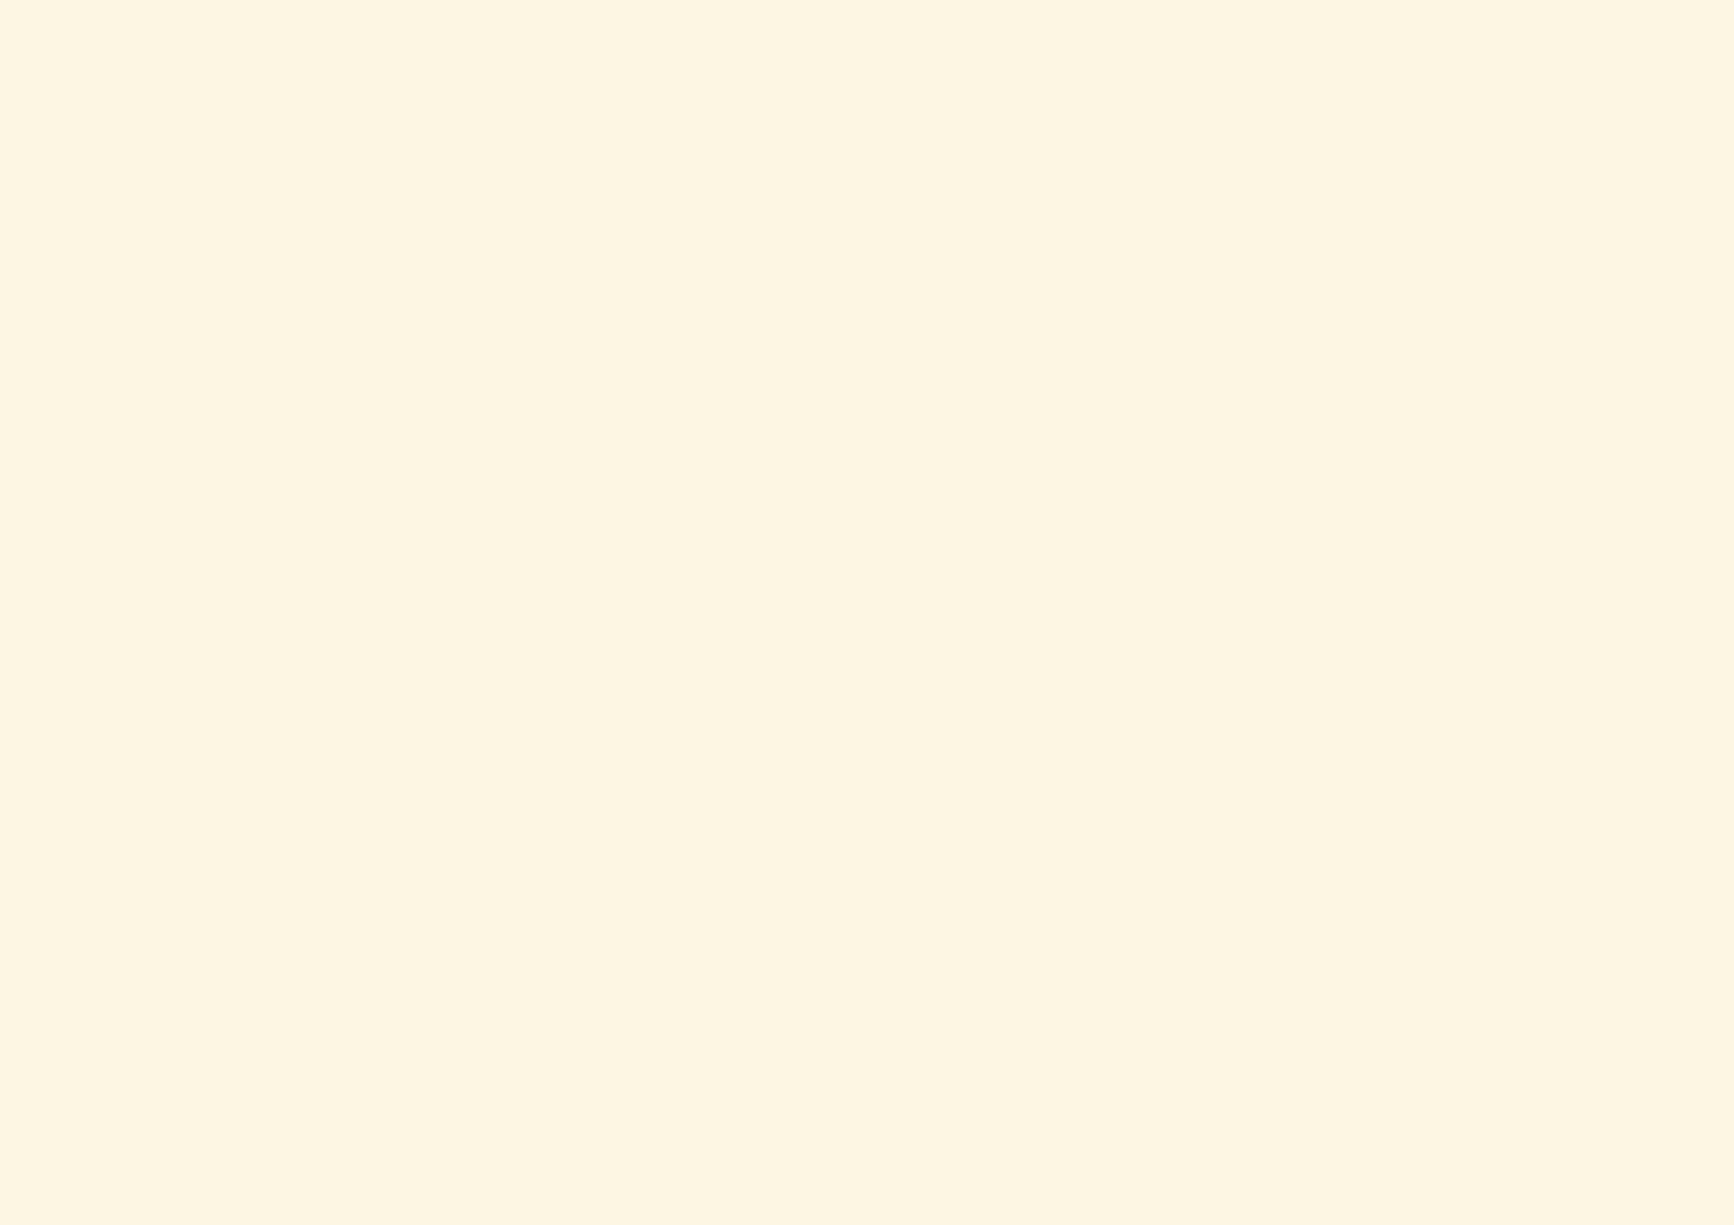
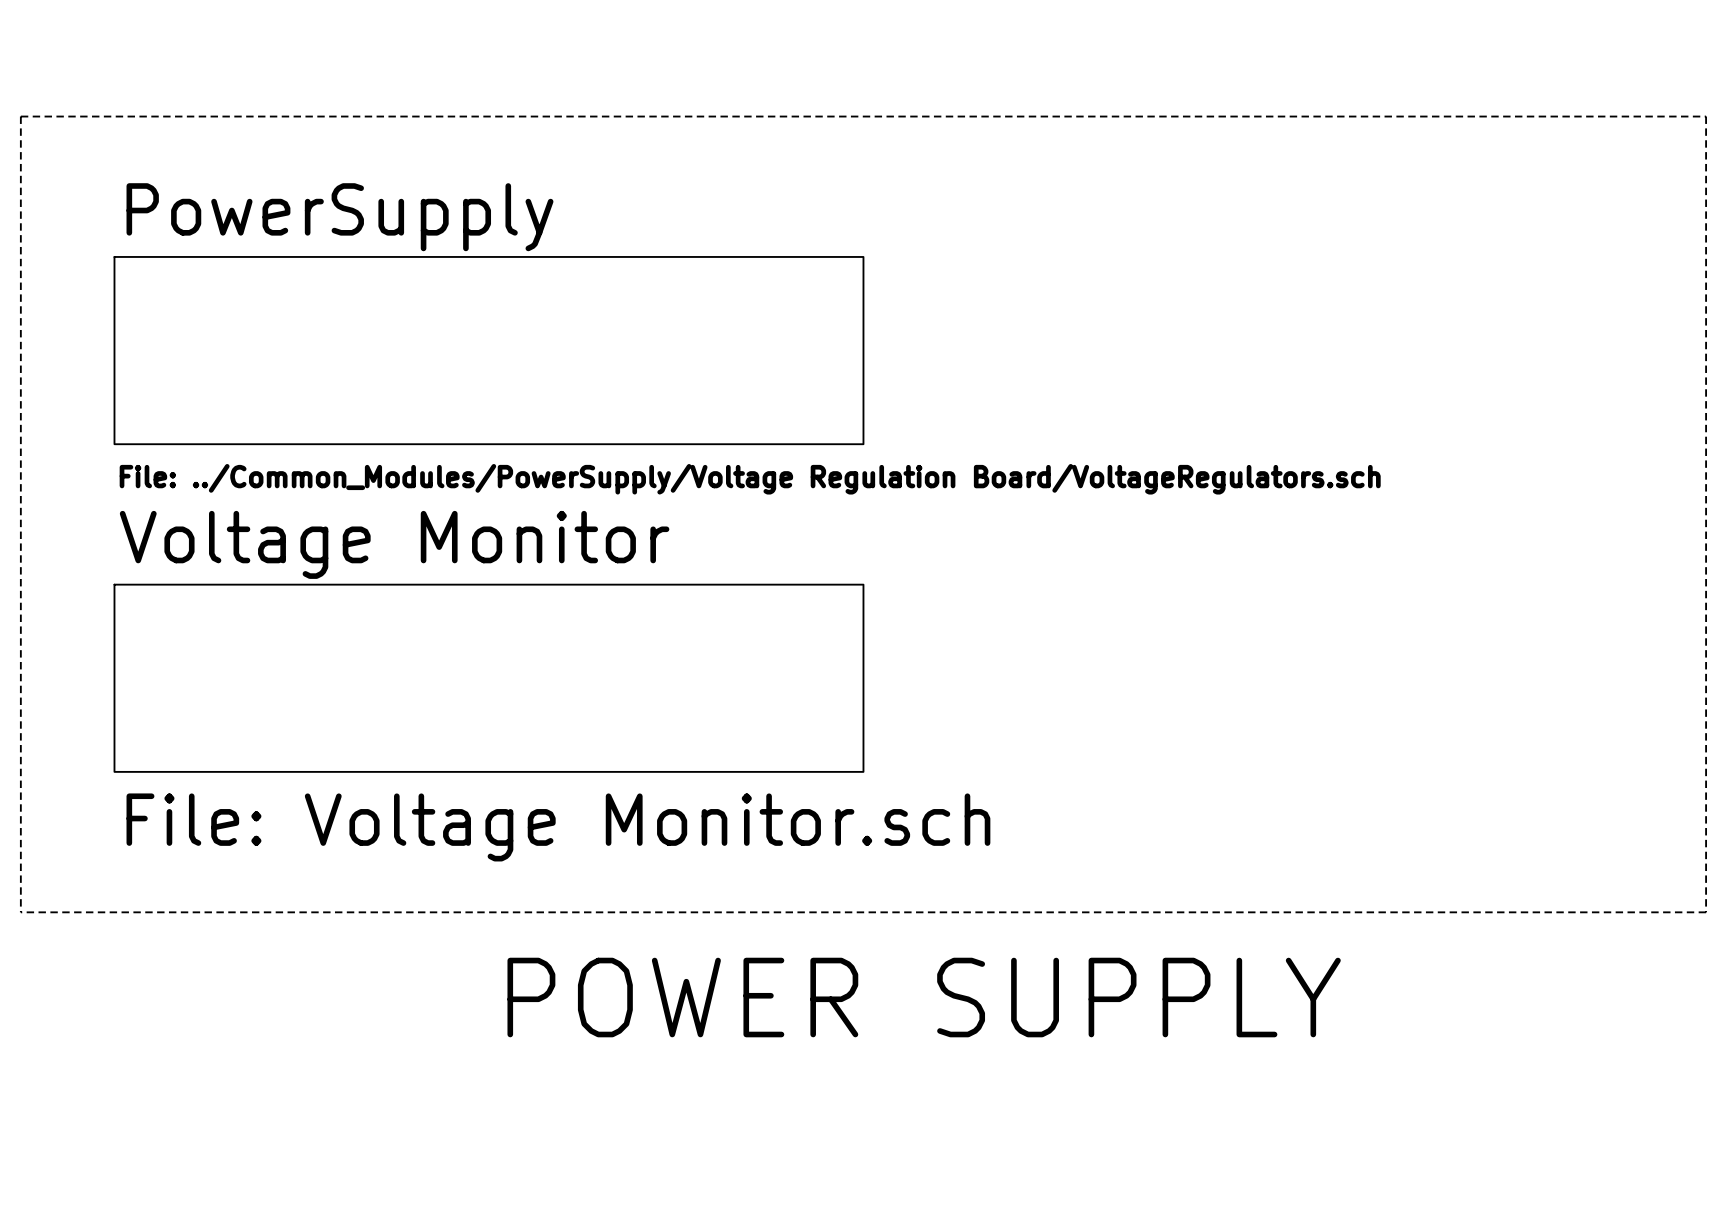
line: none -> (20, 116) (1706, 116) (1706, 912) (20, 912) (20, 116)
sheet PowerSupply: none -> File: ../Common_Modules/PowerSupply/Voltage Regulation Board/VoltageRegulators.sch (488, 350)
sheet Voltage Monitor: none -> File: Voltage Monitor.sch (488, 678)
text: none -> POWER SUPPLY (924, 997)

